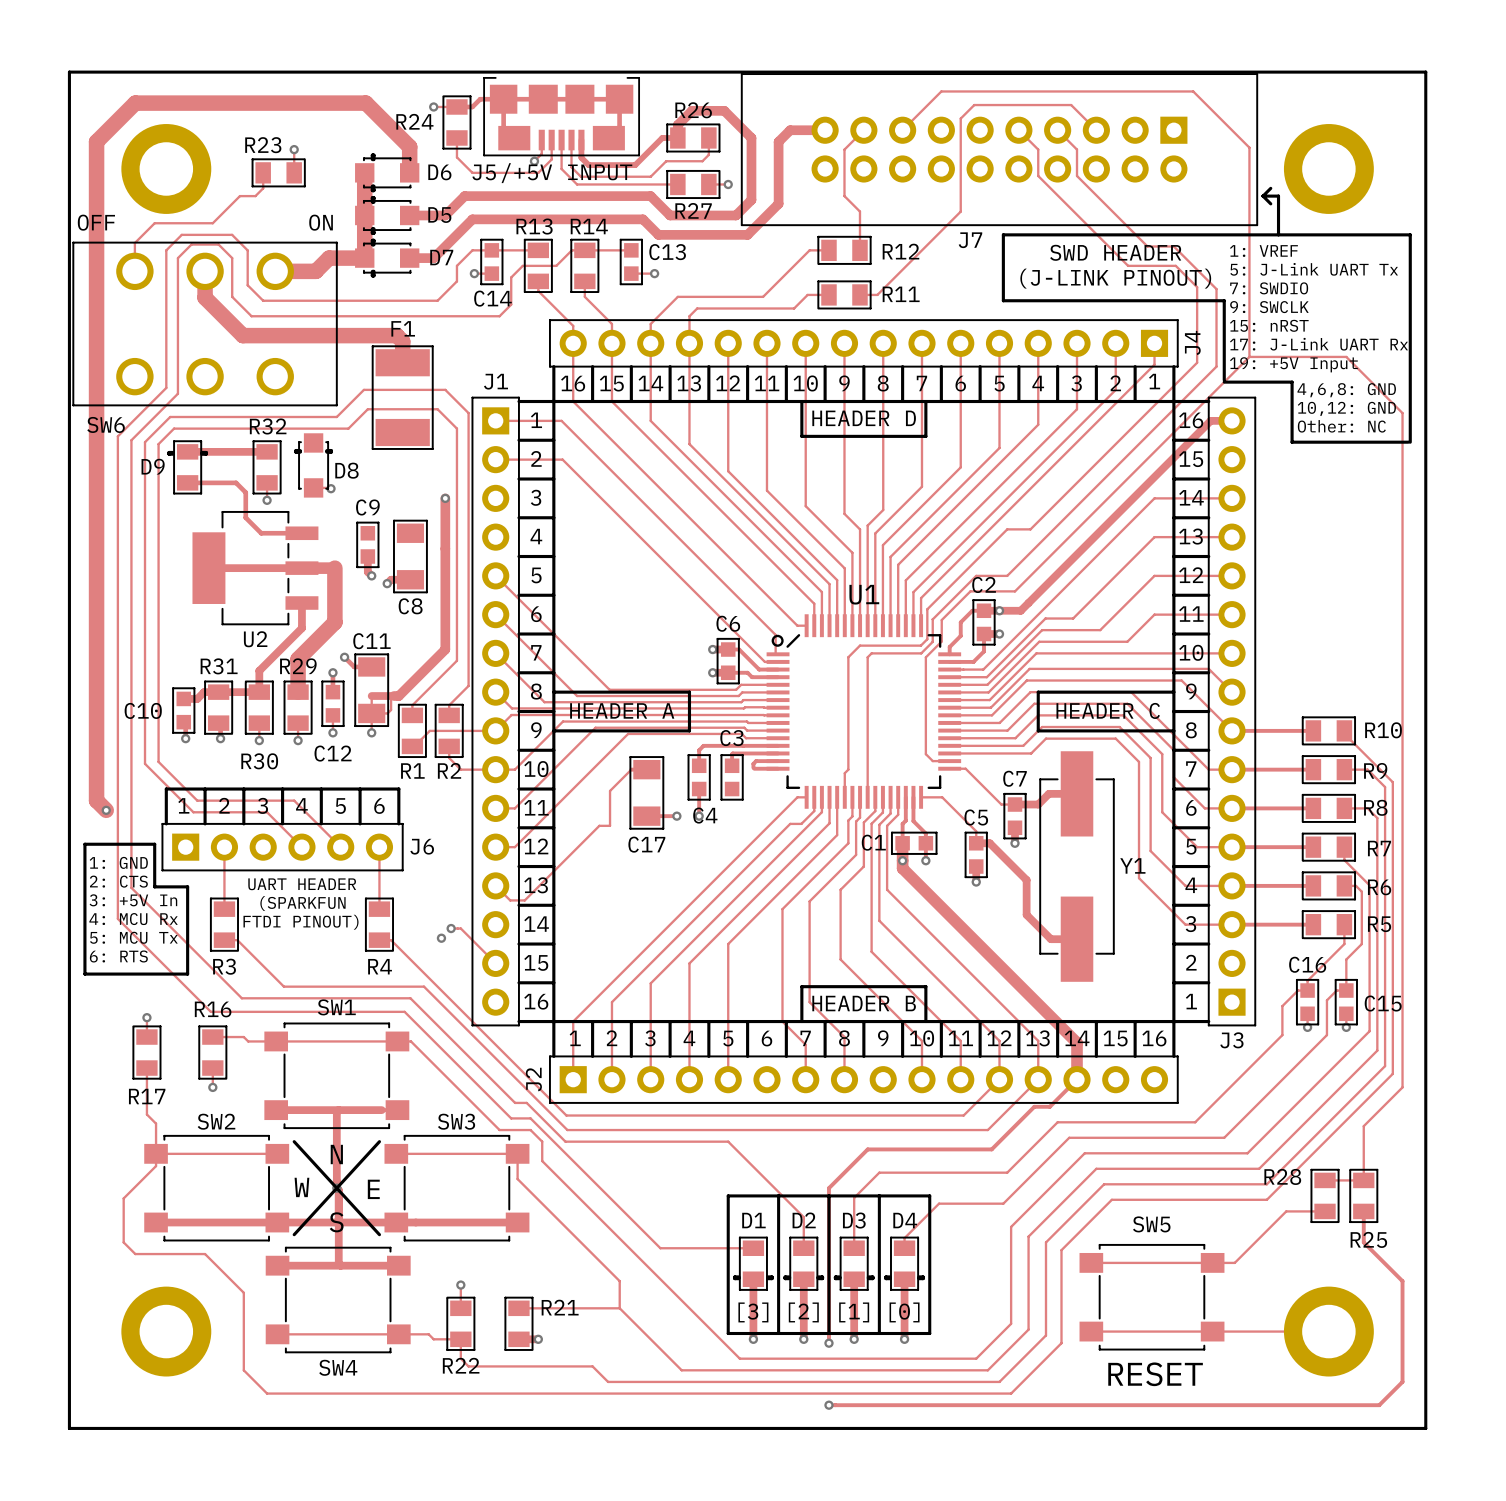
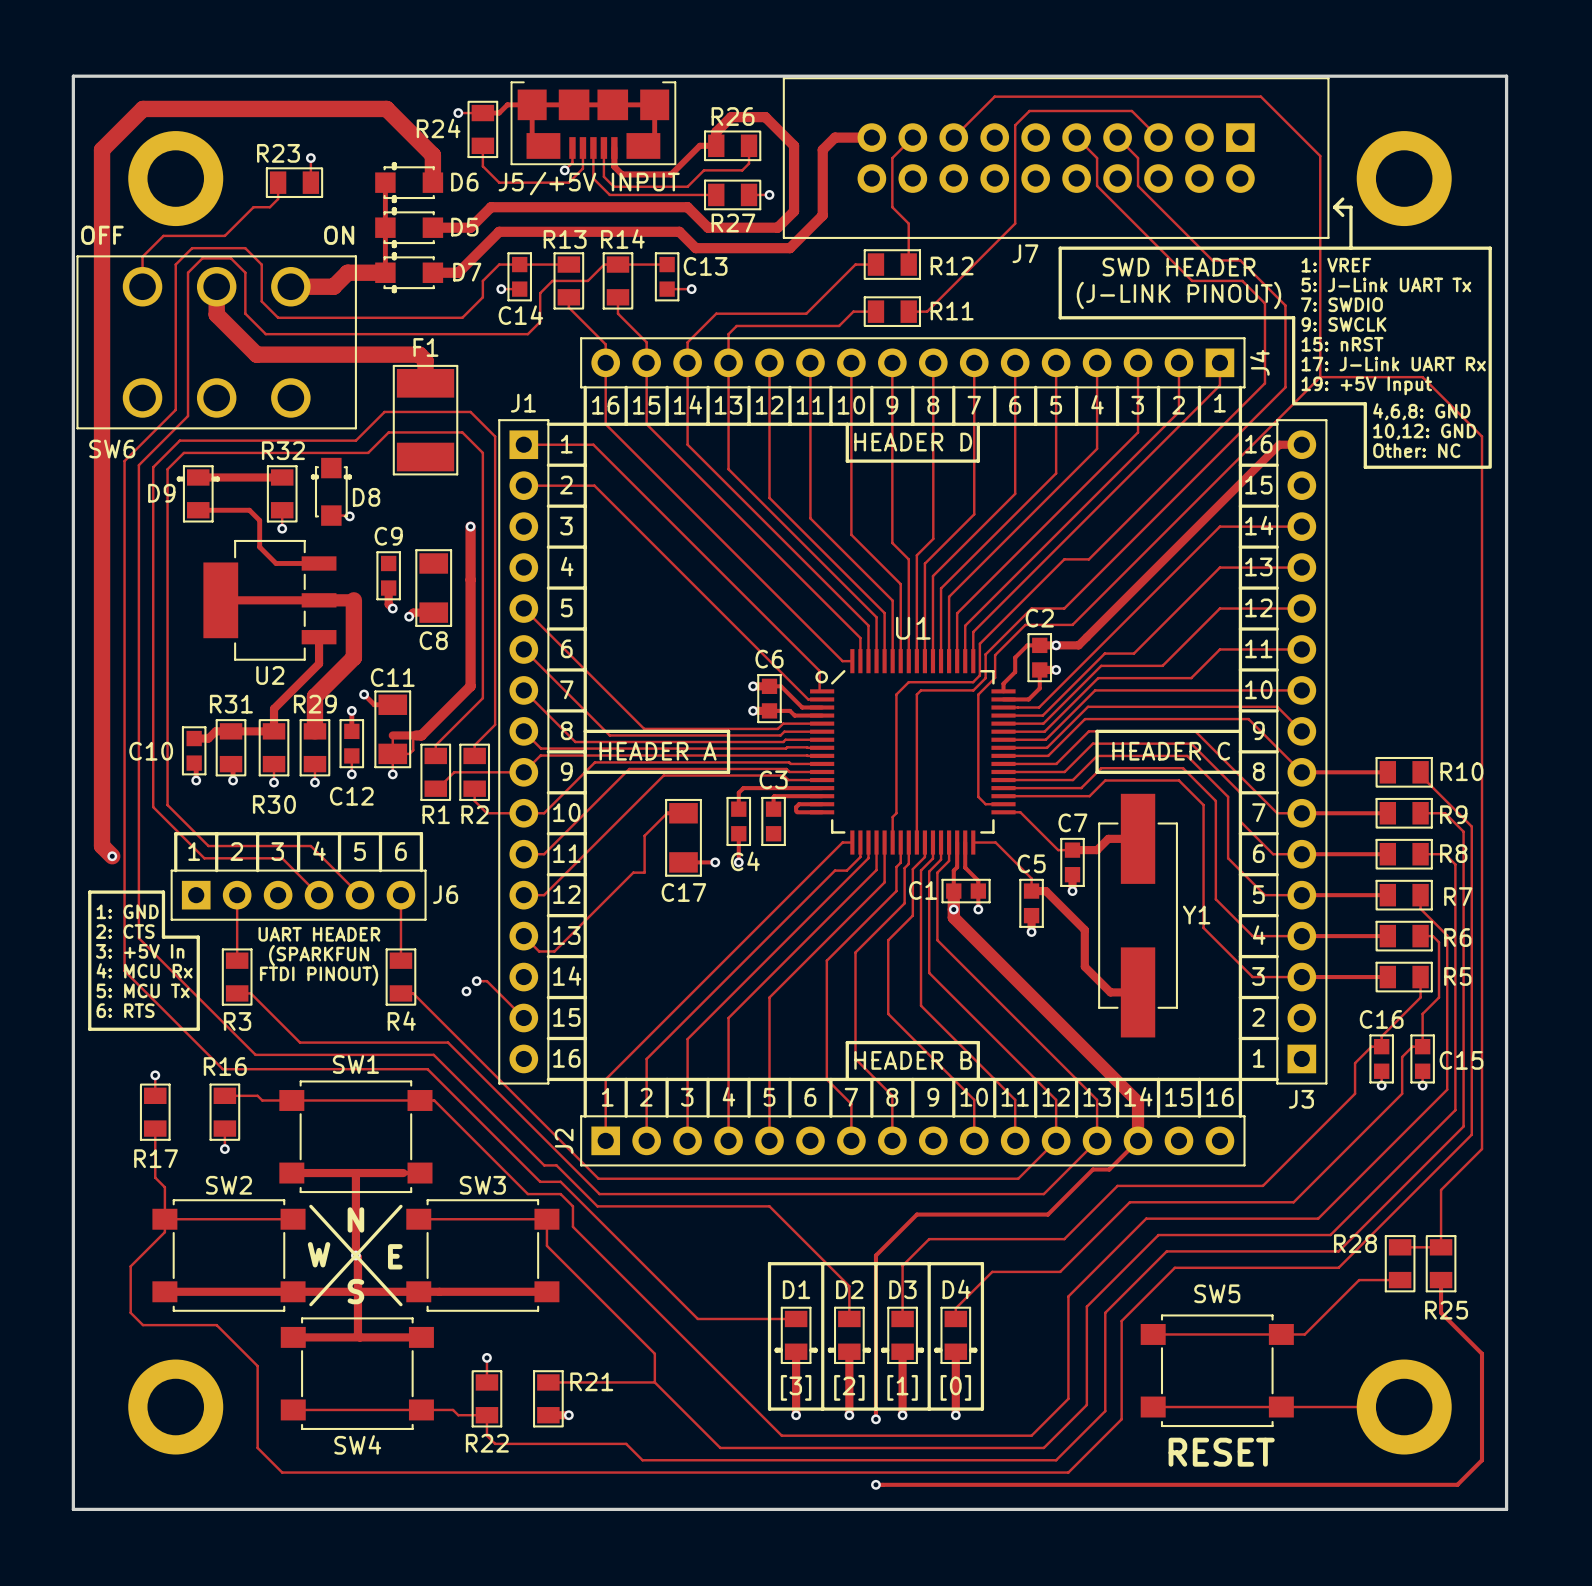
track width: thick (364, 172) (364, 258) -> thin (385, 182) (385, 272)

